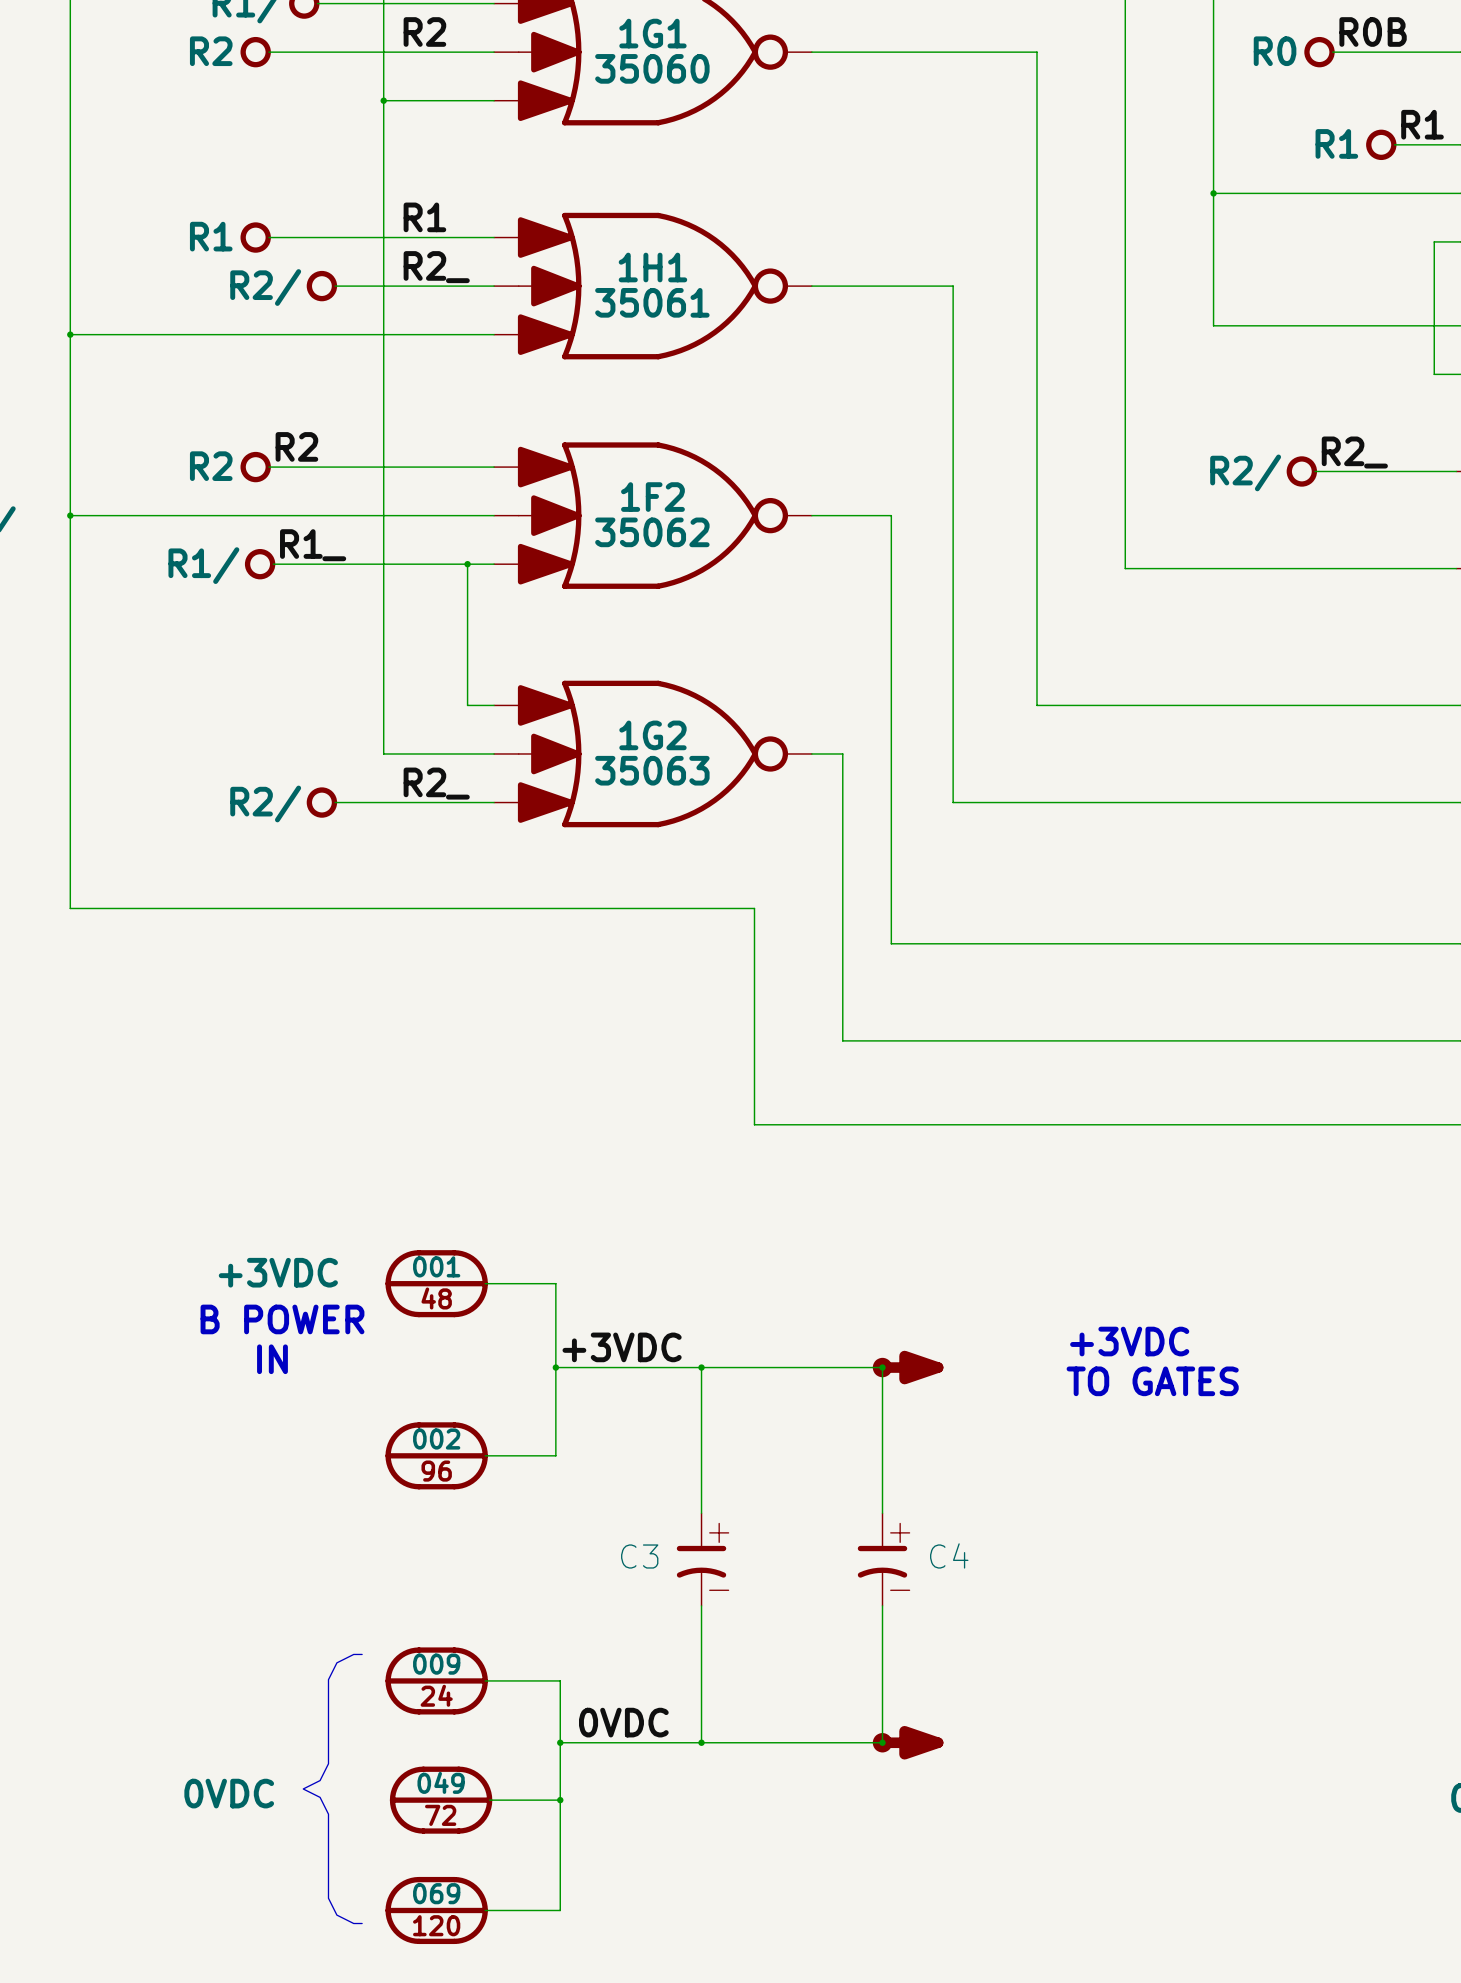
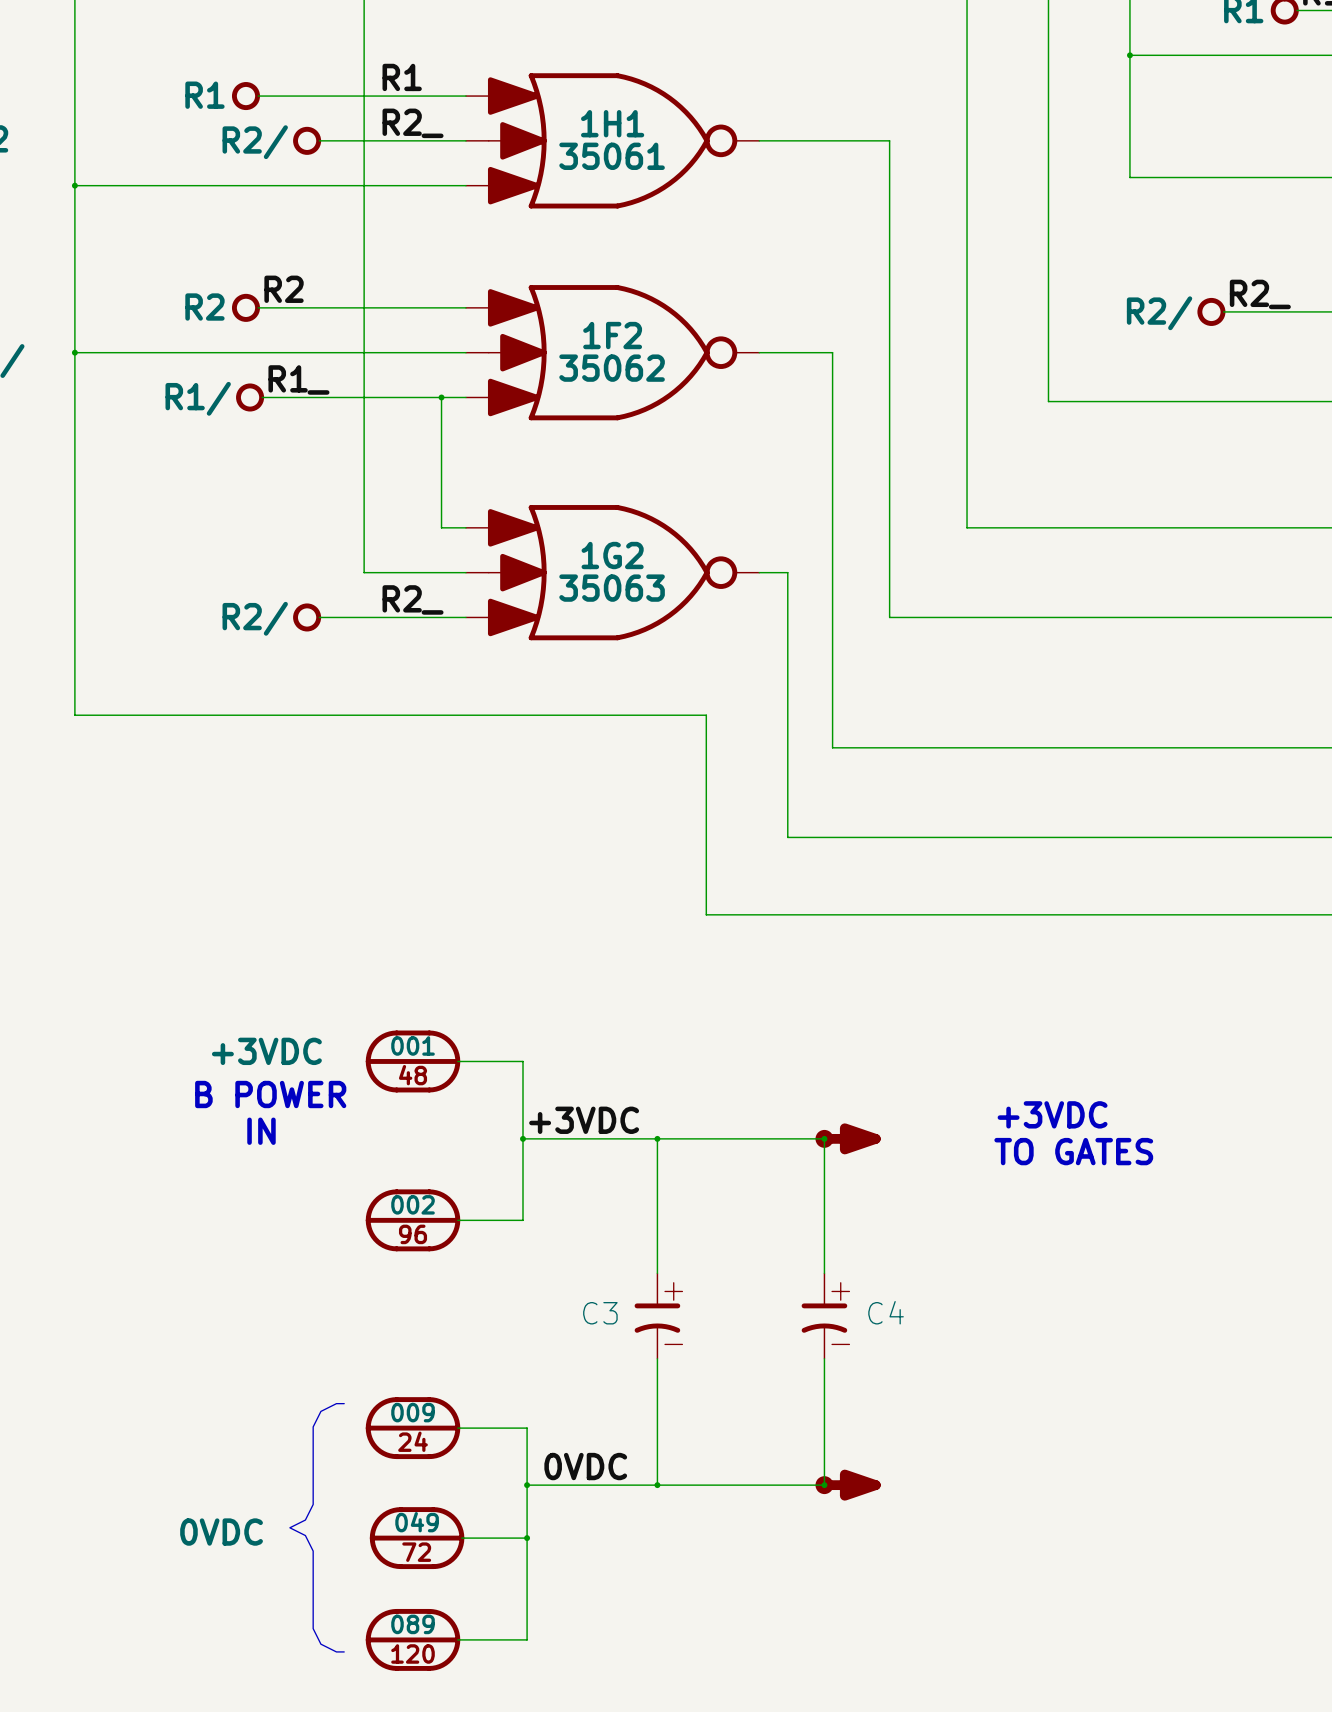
part text: 069 (436, 1893) -> 089 (413, 1624)

